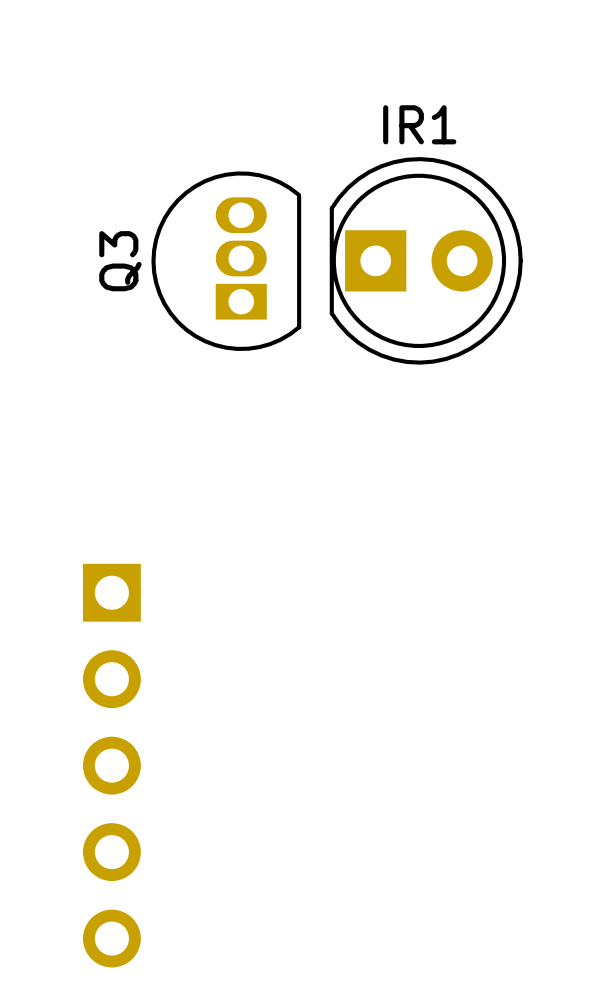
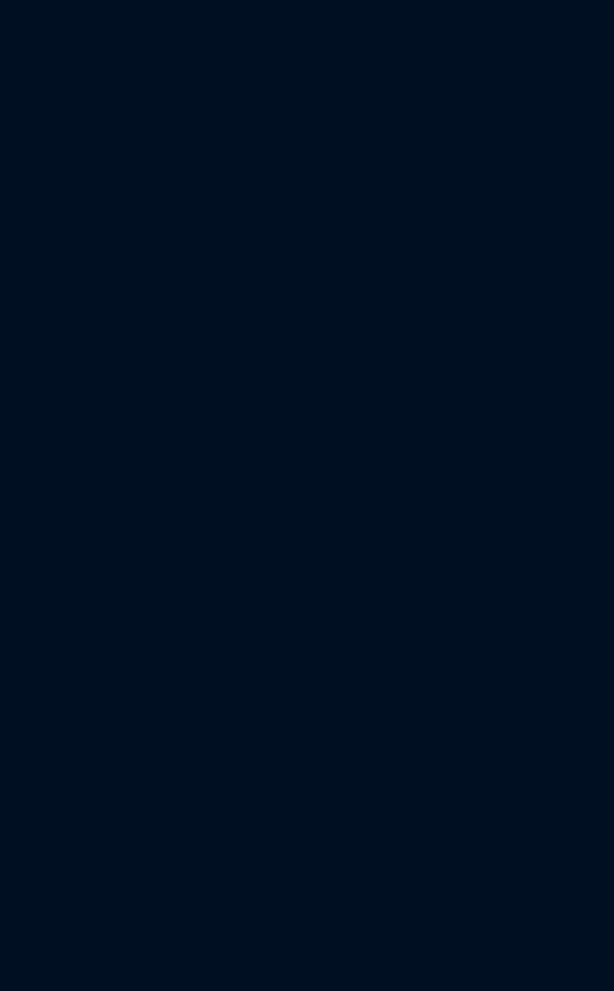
IR1: (426, 260) -> none
Q3: (226, 261) -> none
part: (111, 765) -> none

